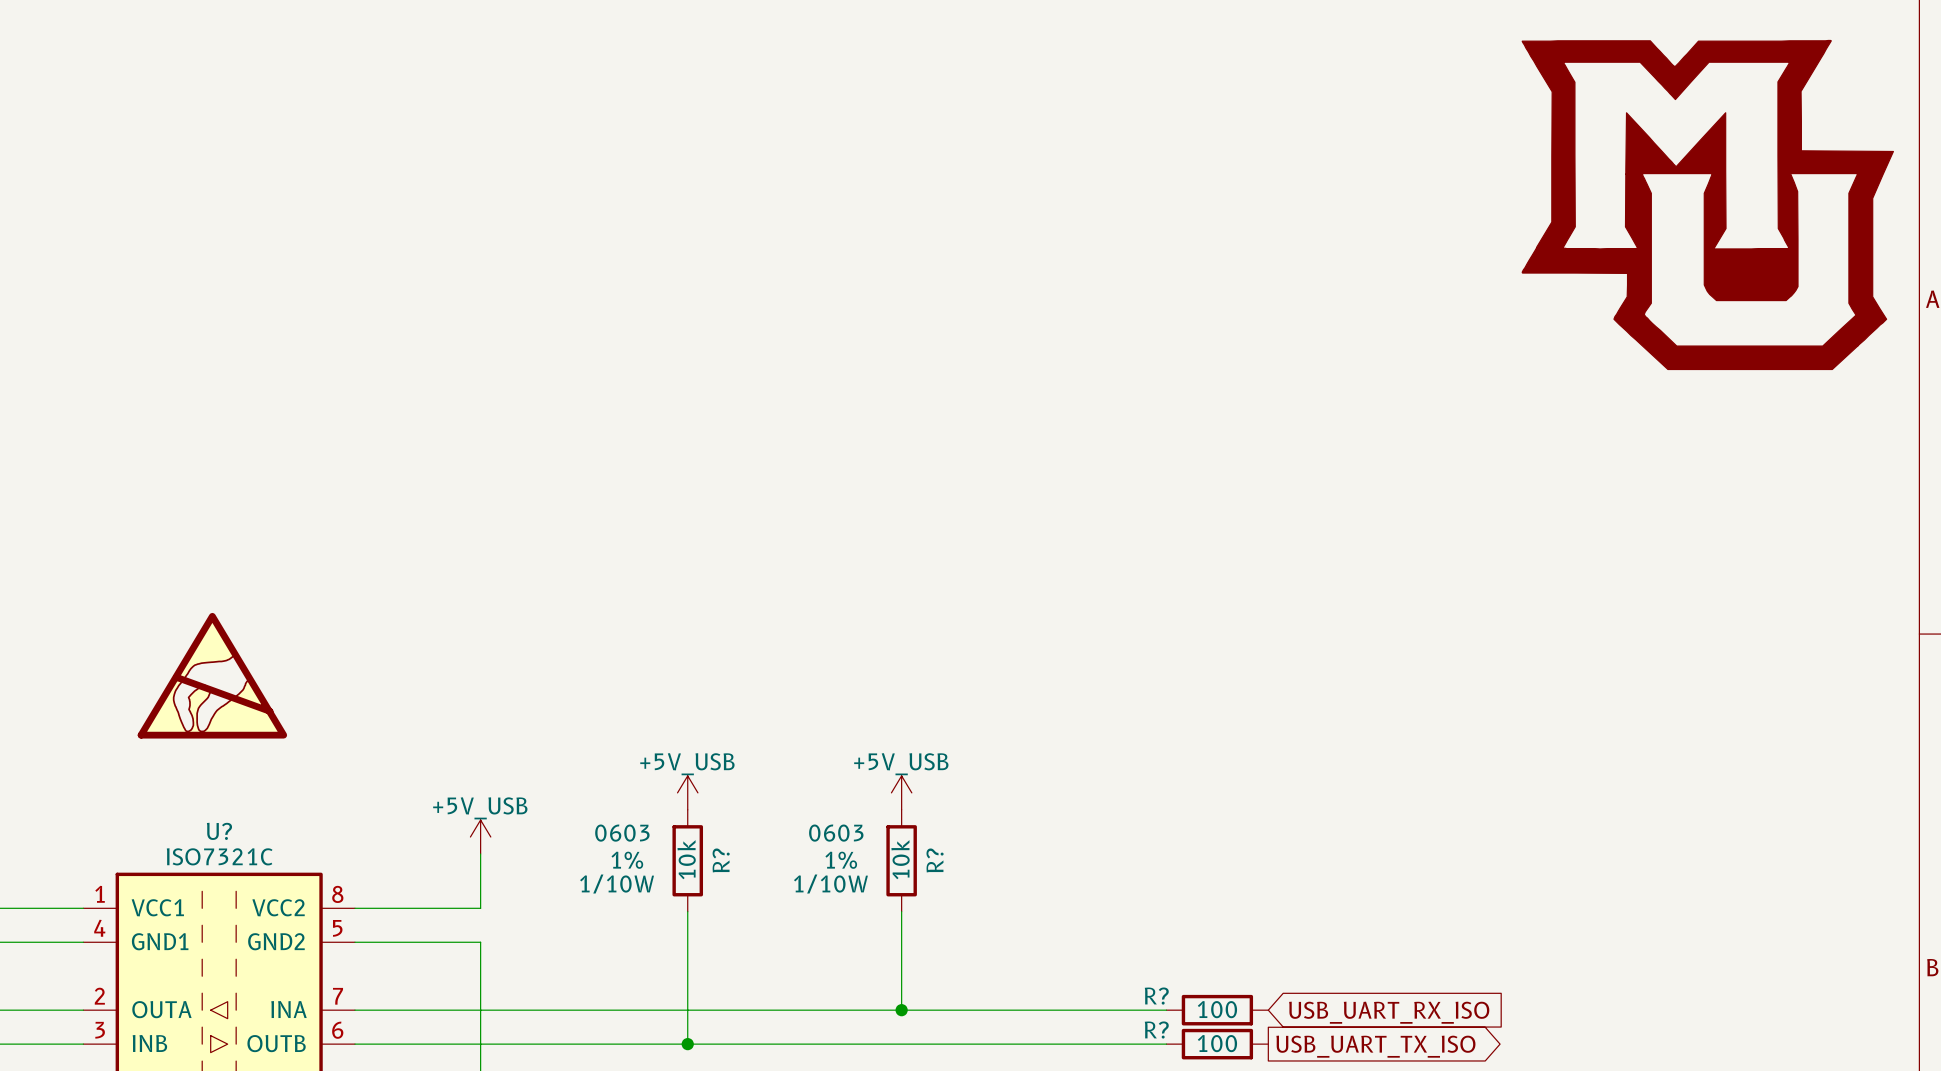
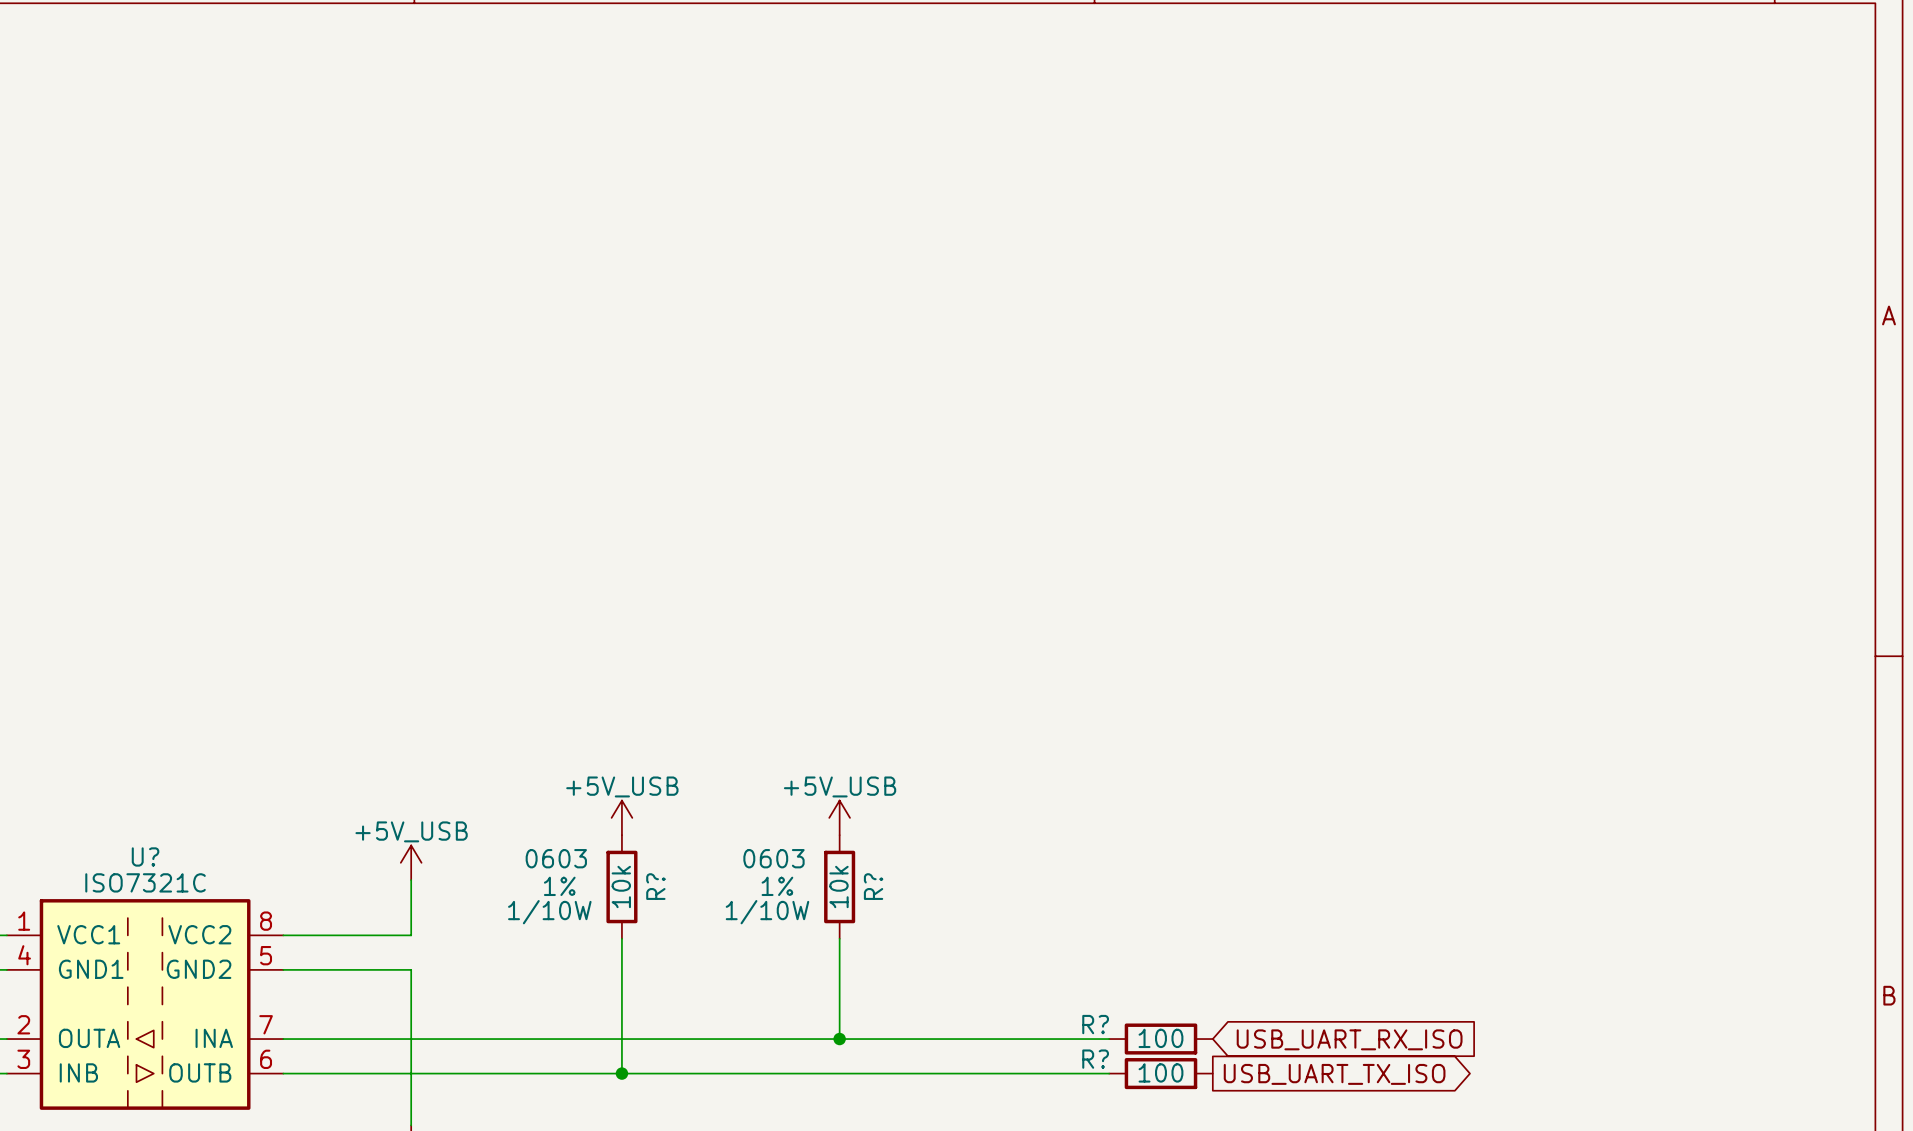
power symbol: (1707, 204) -> none
power symbol: (212, 675) -> none

